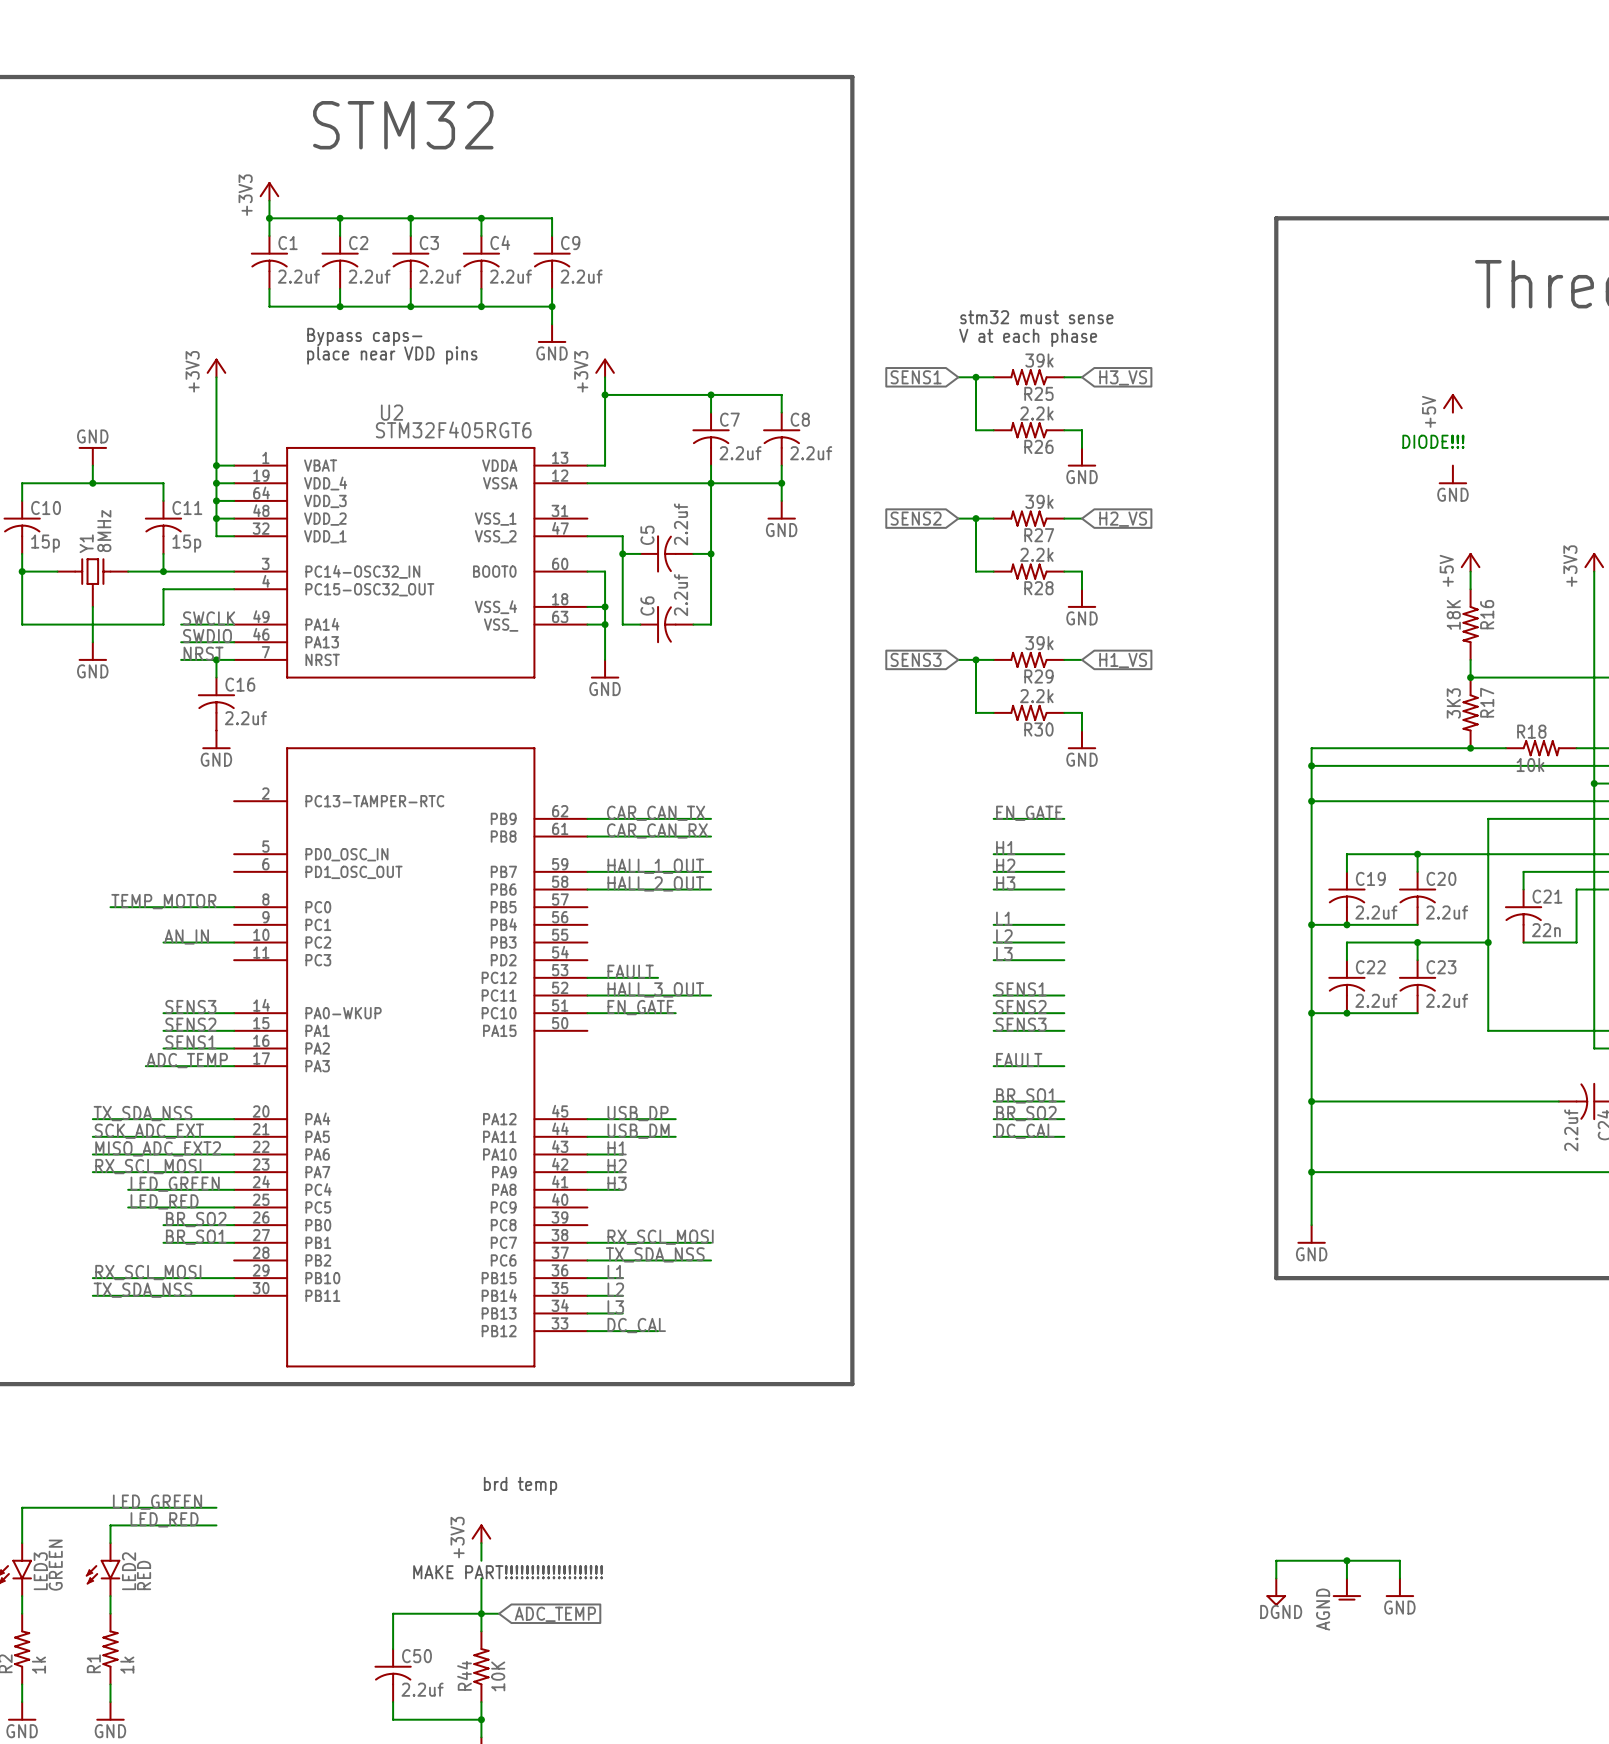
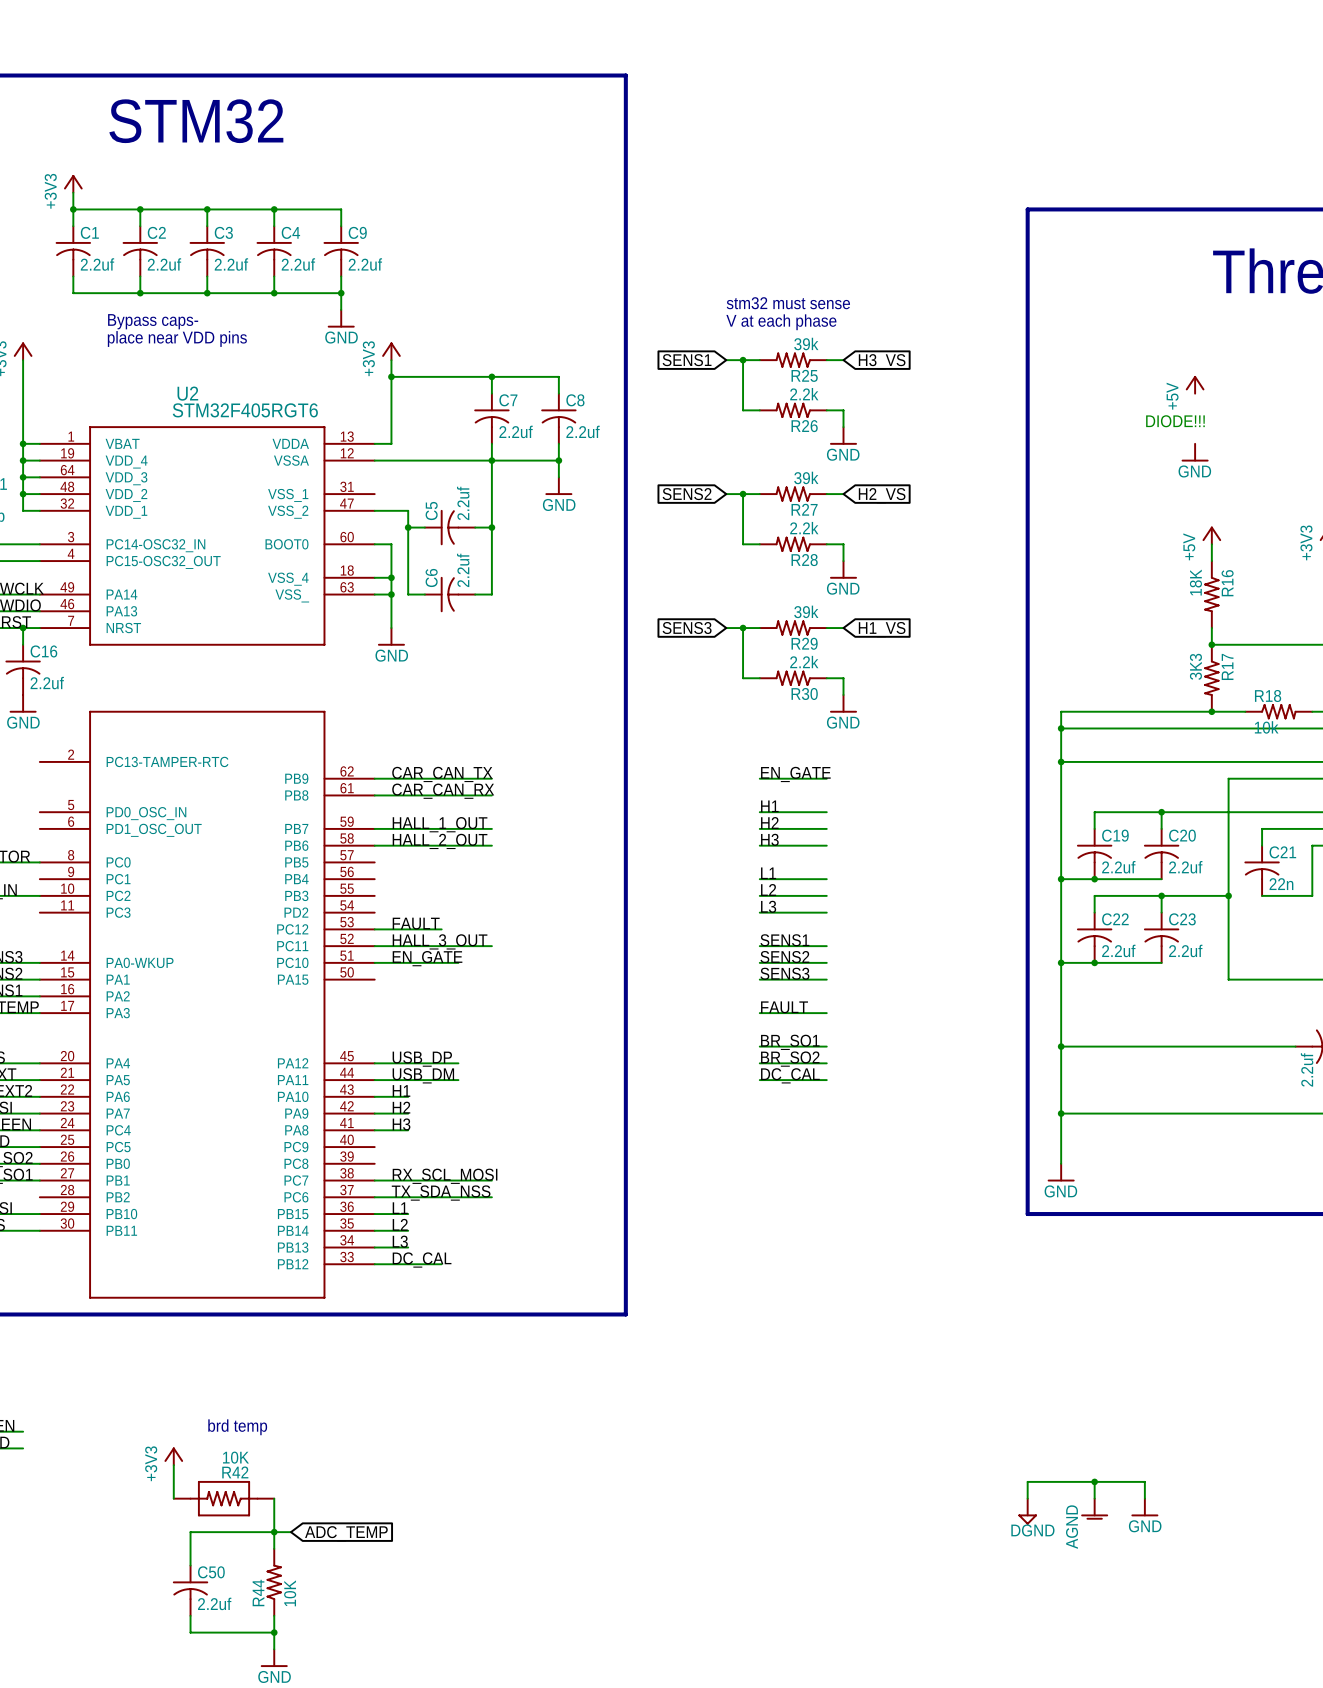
text position: brd temp (520, 1485) -> brd temp (237, 1427)
power symbol position: +3V3 (481, 1533) -> +3V3 (173, 1456)
wire: none -> (173, 1465) (173, 1498)
wire: (481, 1543) (481, 1560) -> none
text: MAKE PART!!!!!!!!!!!!!!!!!!! (508, 1572) -> none
R42: none -> 10K (224, 1498)

